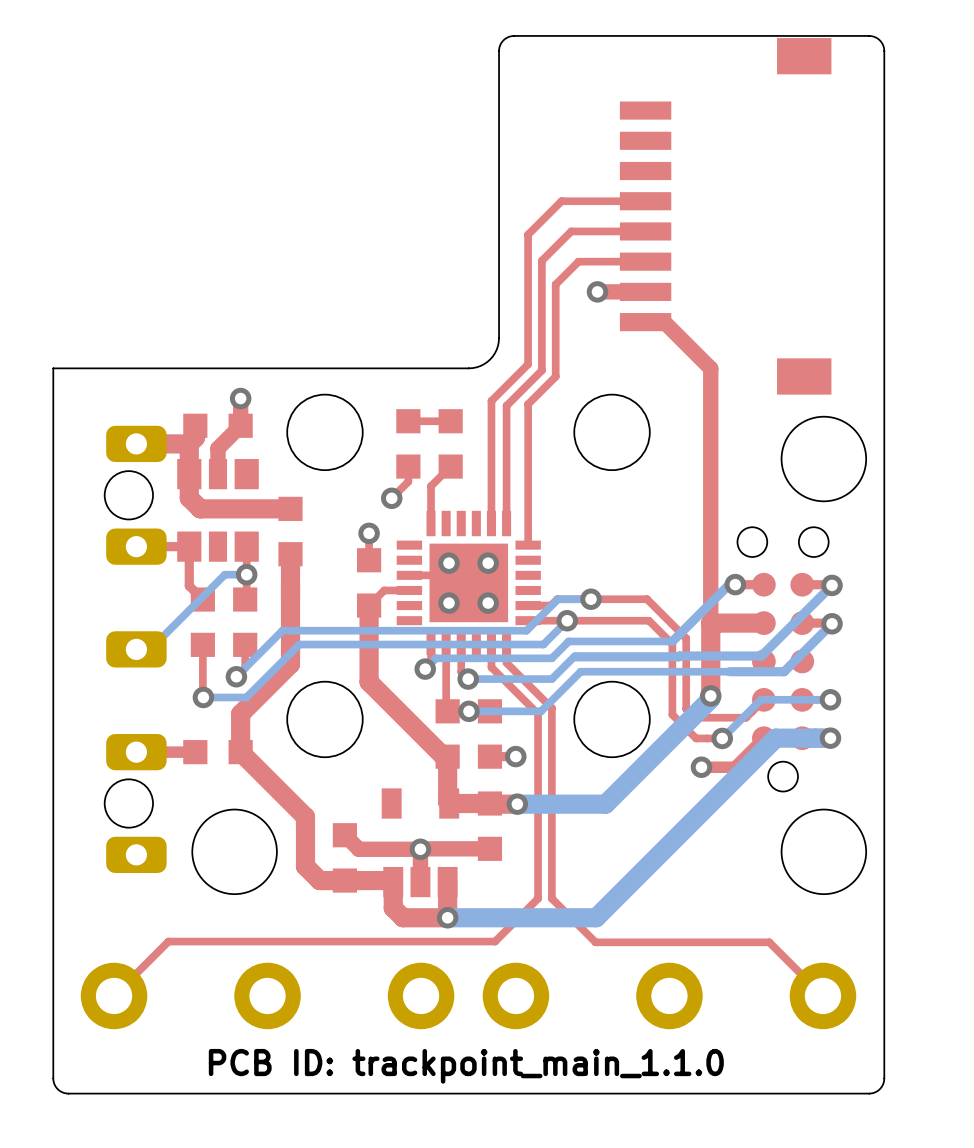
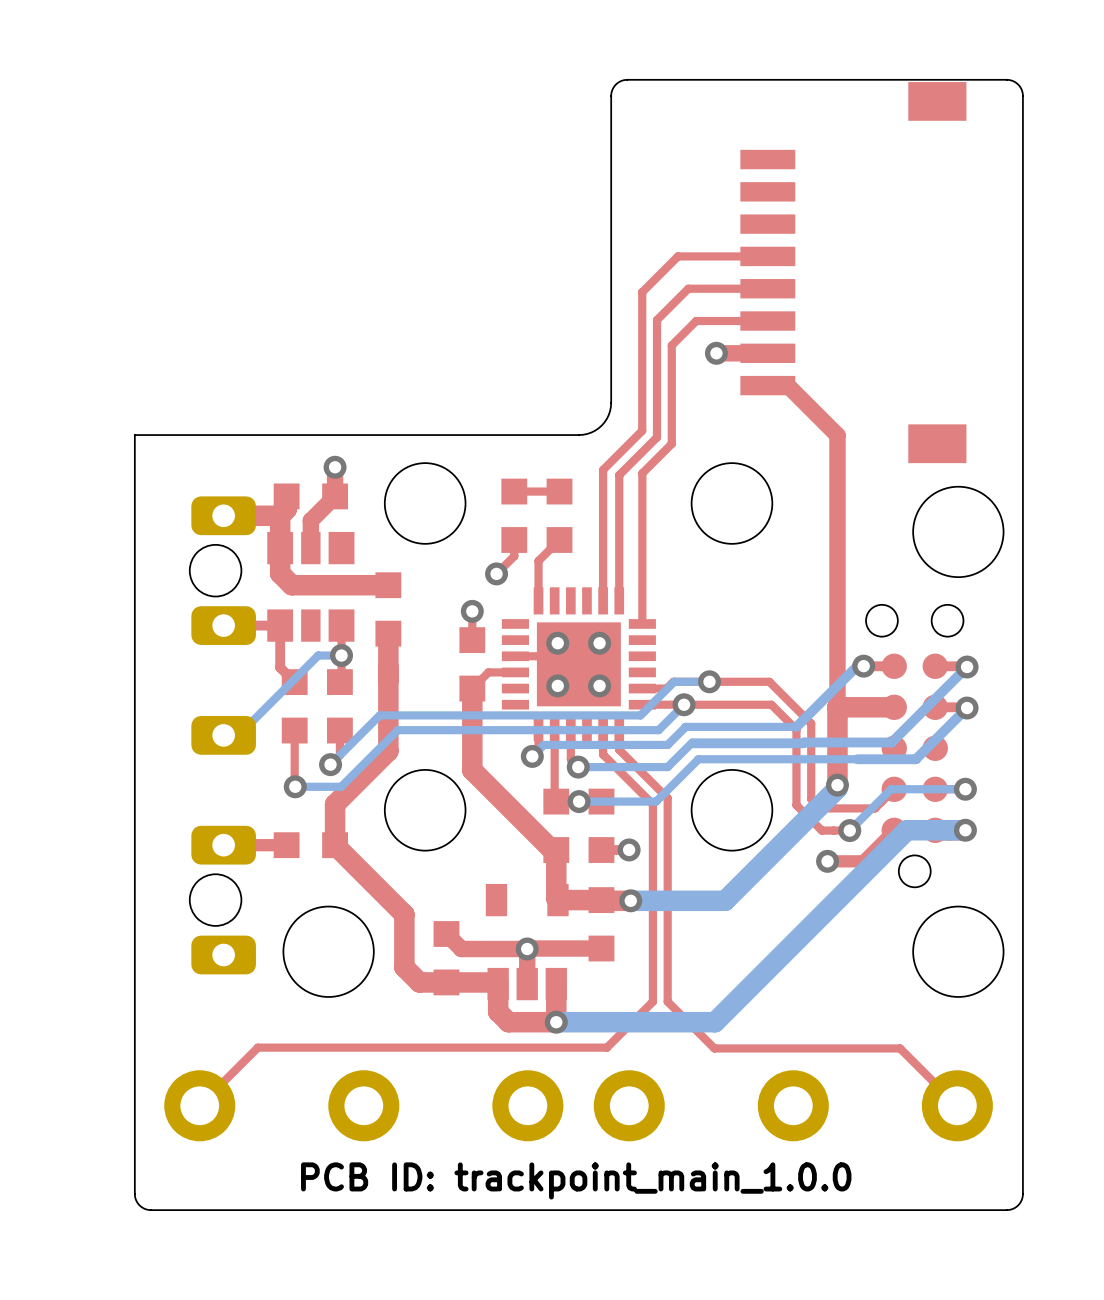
text: PCB ID: trackpoint_main_1.1.0 (466, 1066) -> PCB ID: trackpoint_main_1.0.0 (576, 1180)

